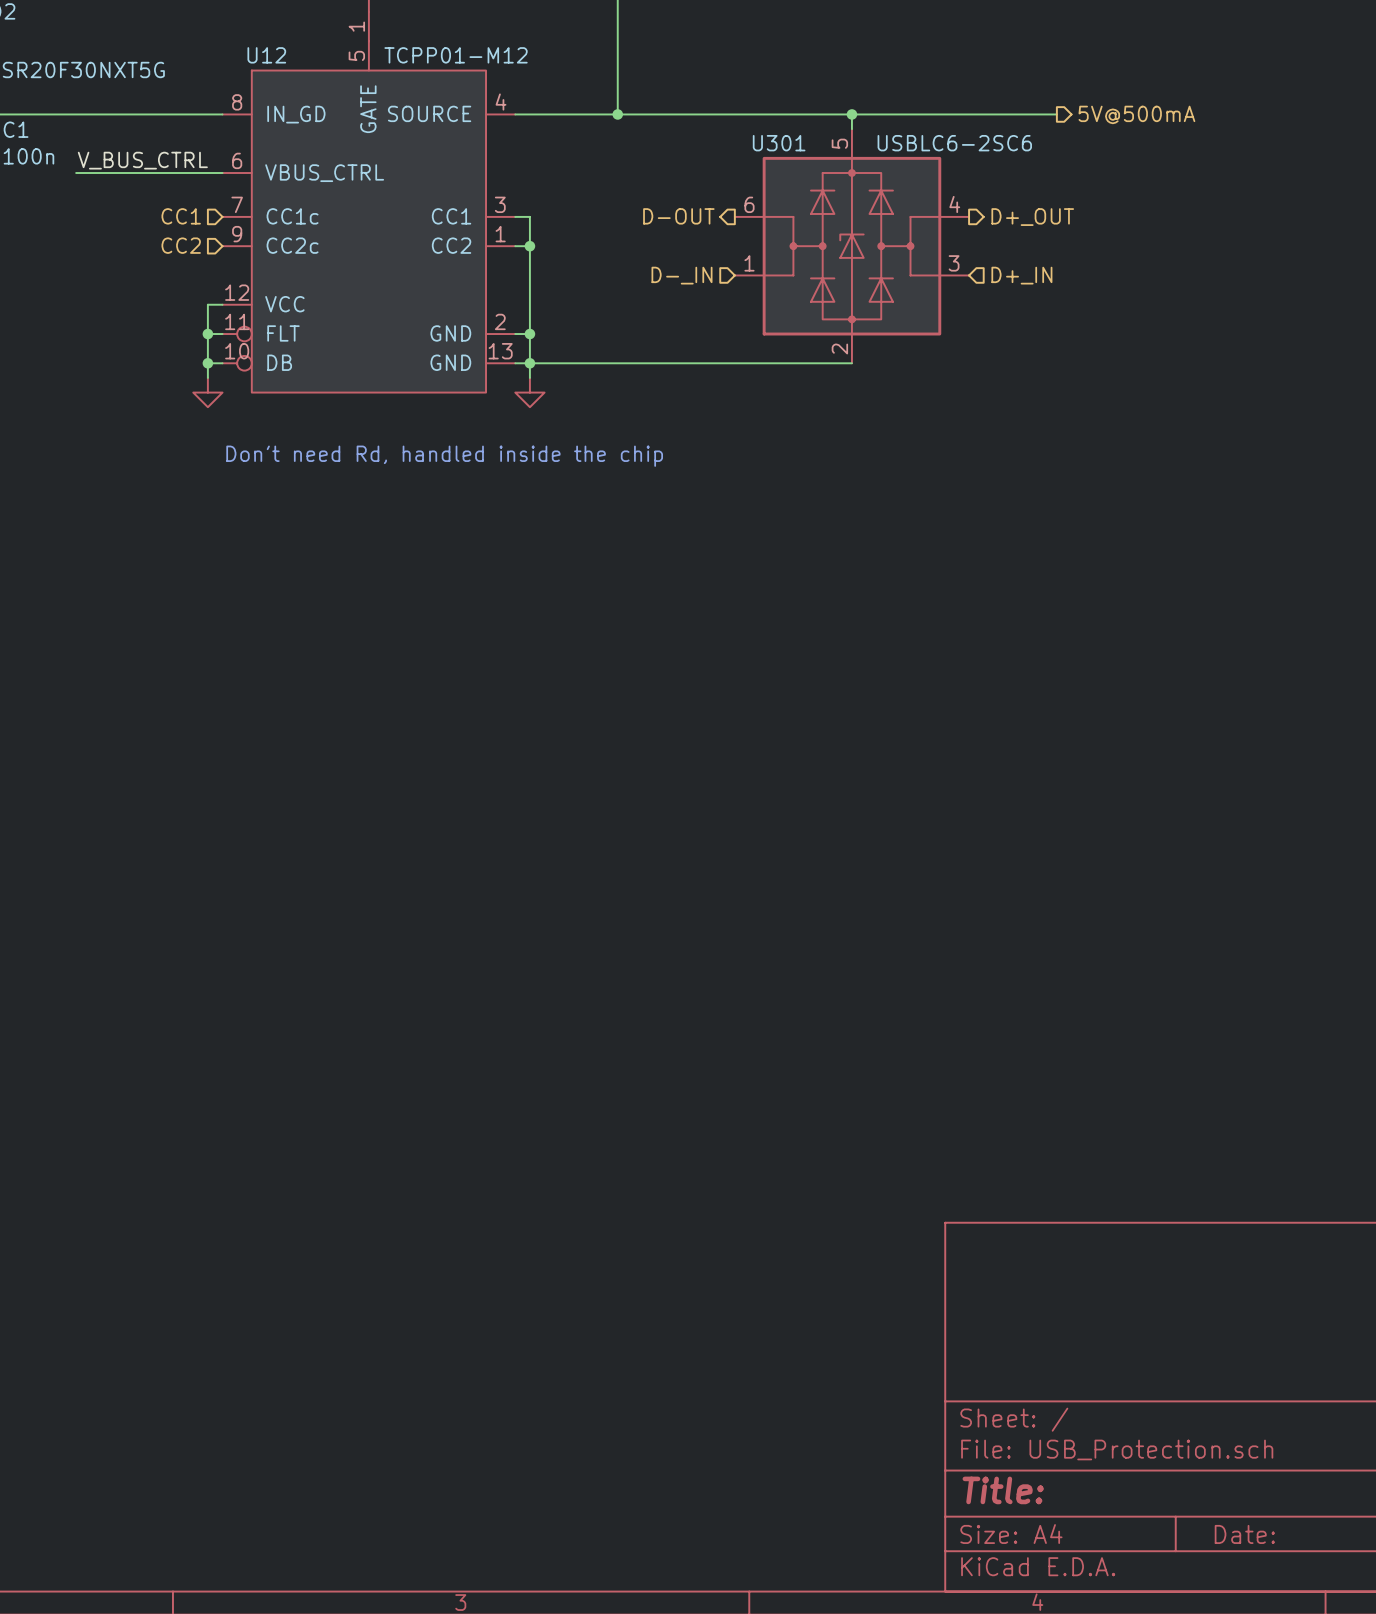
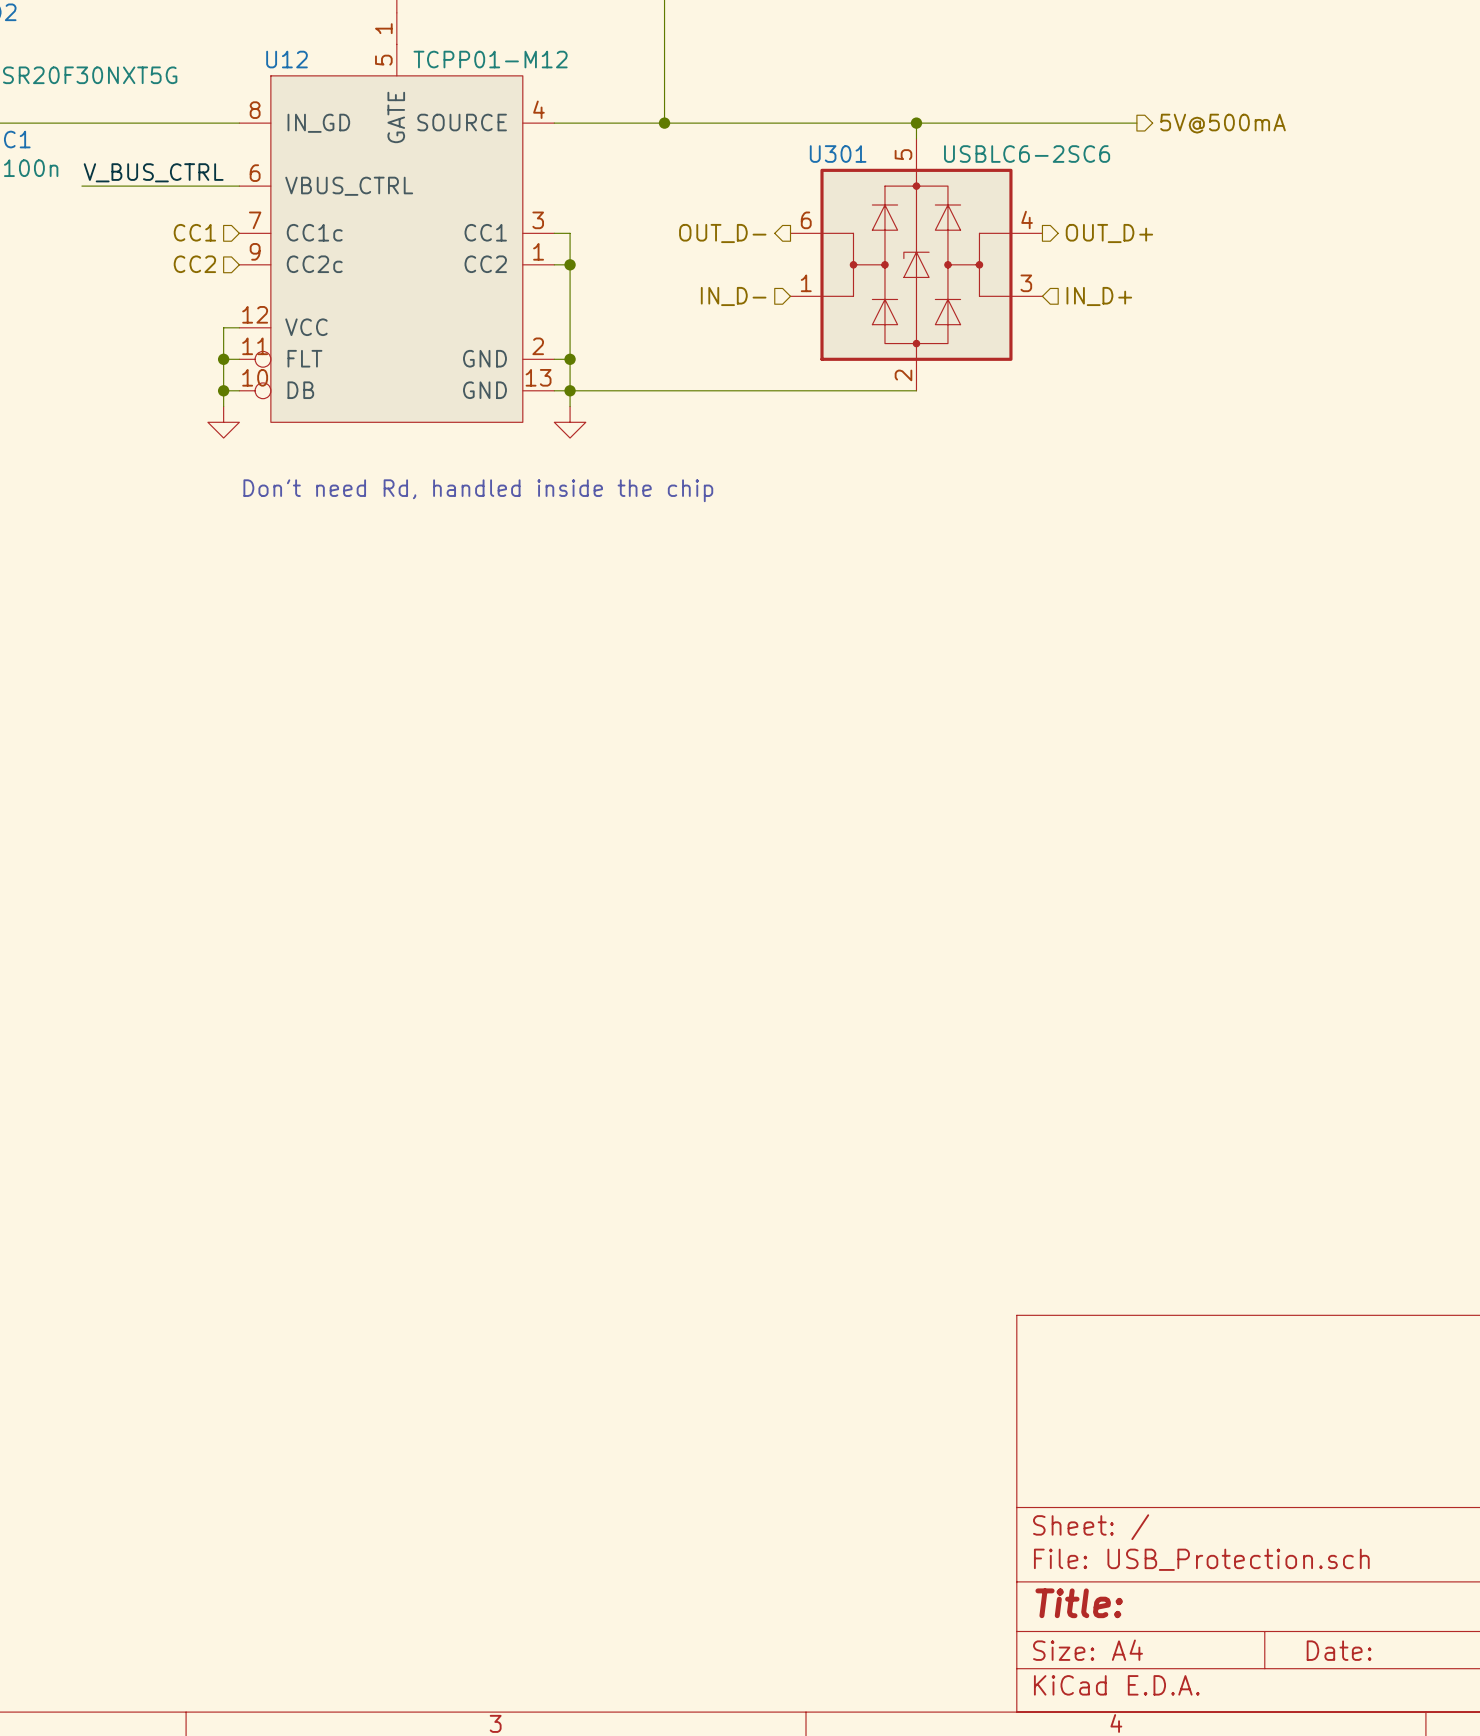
hierarchical label: D-OUT (678, 216) -> OUT_D- (722, 233)
hierarchical label: D+_OUT (1032, 217) -> OUT_D+ (1109, 233)
hierarchical label: D-_IN (682, 275) -> IN_D- (733, 296)
hierarchical label: D+_IN (1021, 275) -> IN_D+ (1099, 296)

